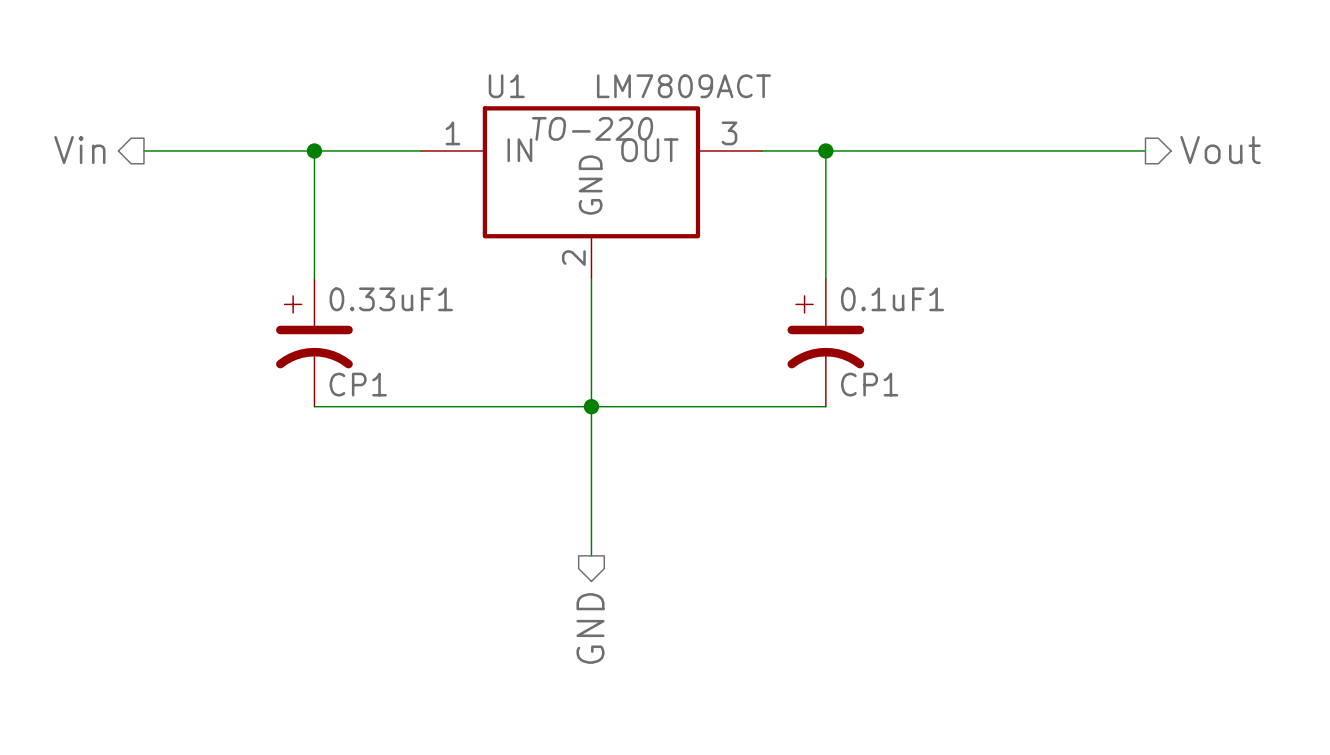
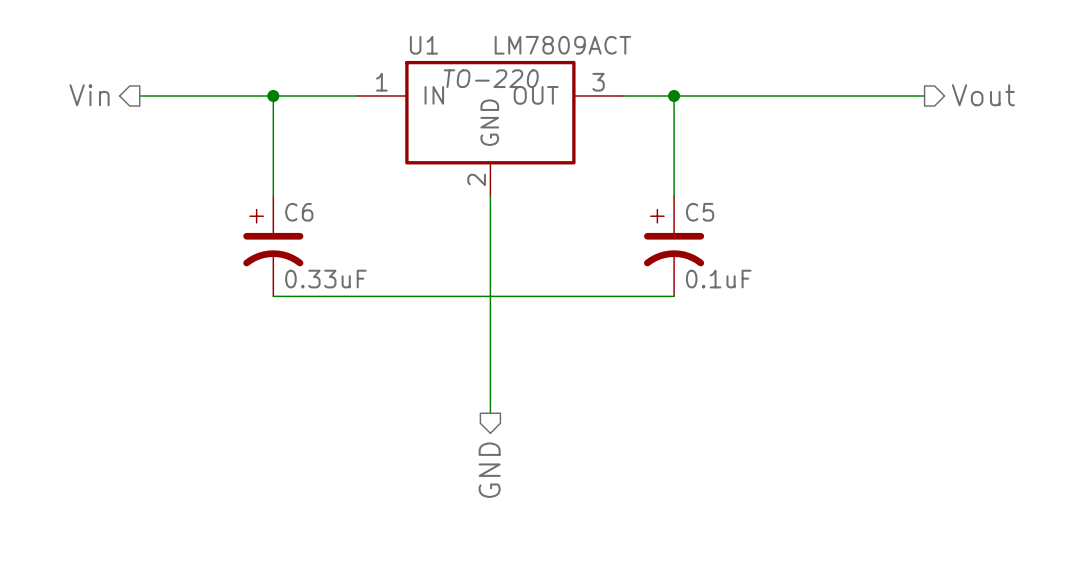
0.33uF1 name: 0.33uF1 (391, 299) -> C6 (299, 212)
0.1uF1 name: 0.1uF1 (892, 299) -> C5 (700, 212)
0.33uF1 value: CP1 (358, 384) -> 0.33uF (325, 279)
0.1uF1 value: CP1 (869, 384) -> 0.1uF (718, 279)
junction: (591, 406) -> none

